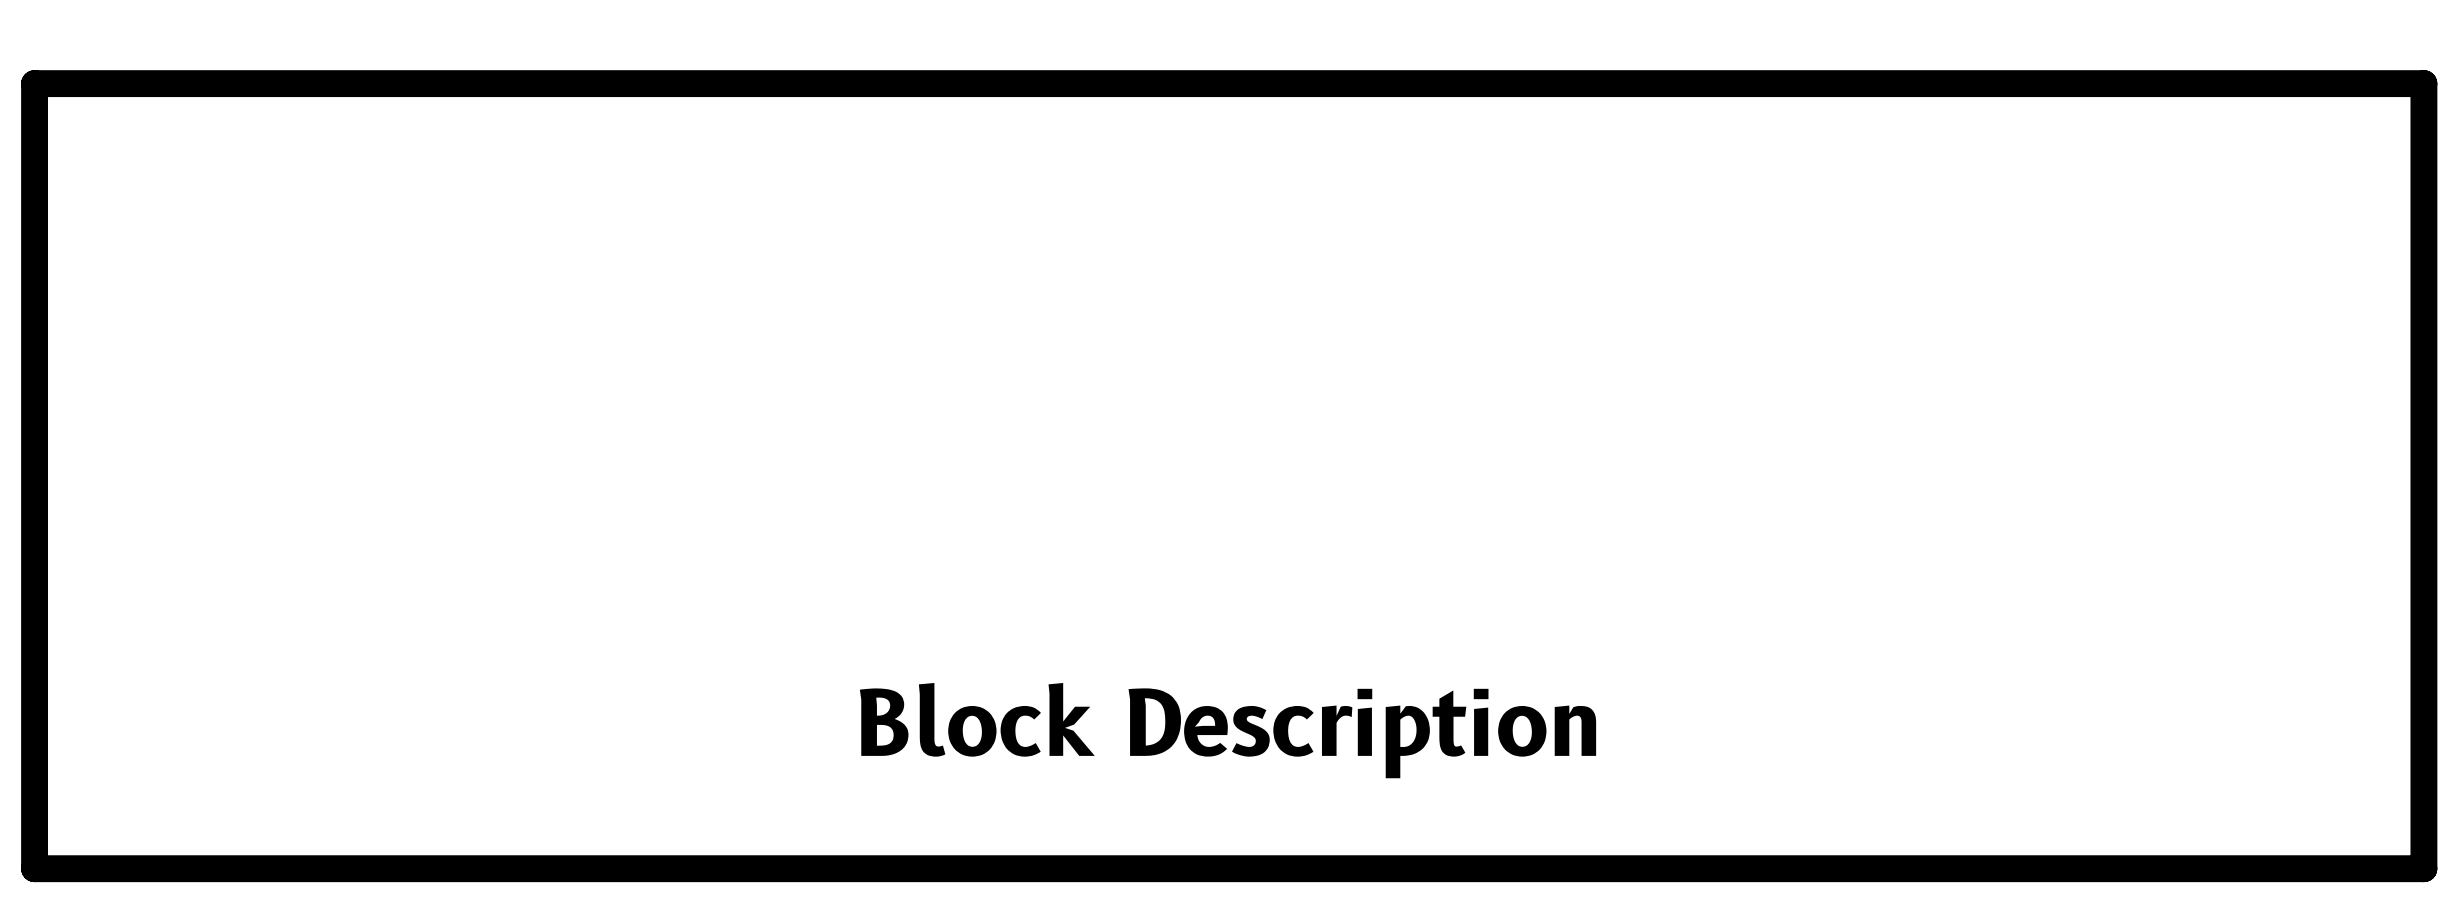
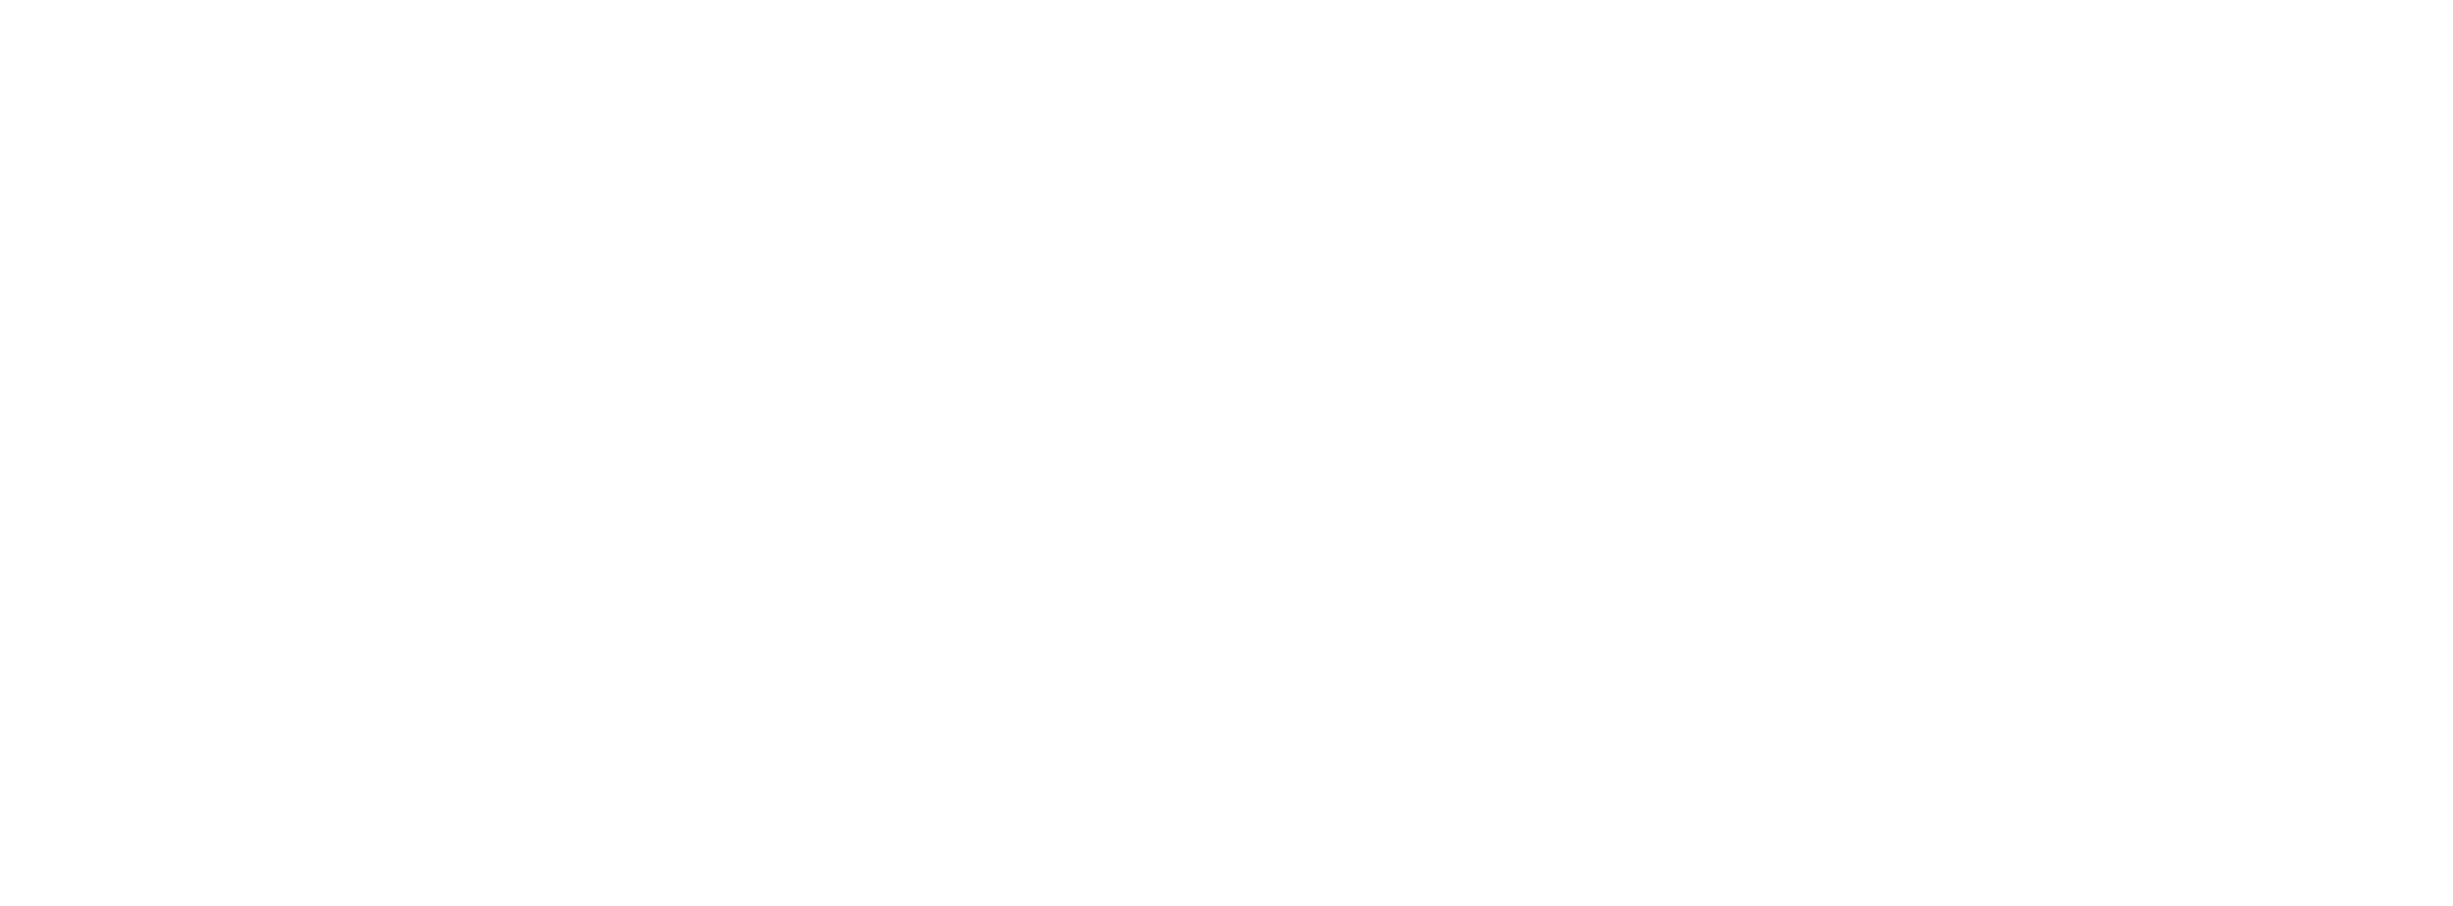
line: (34, 83) (2423, 83) (2423, 868) (34, 868) (34, 83) -> none
text: Block Description (1227, 730) -> none

